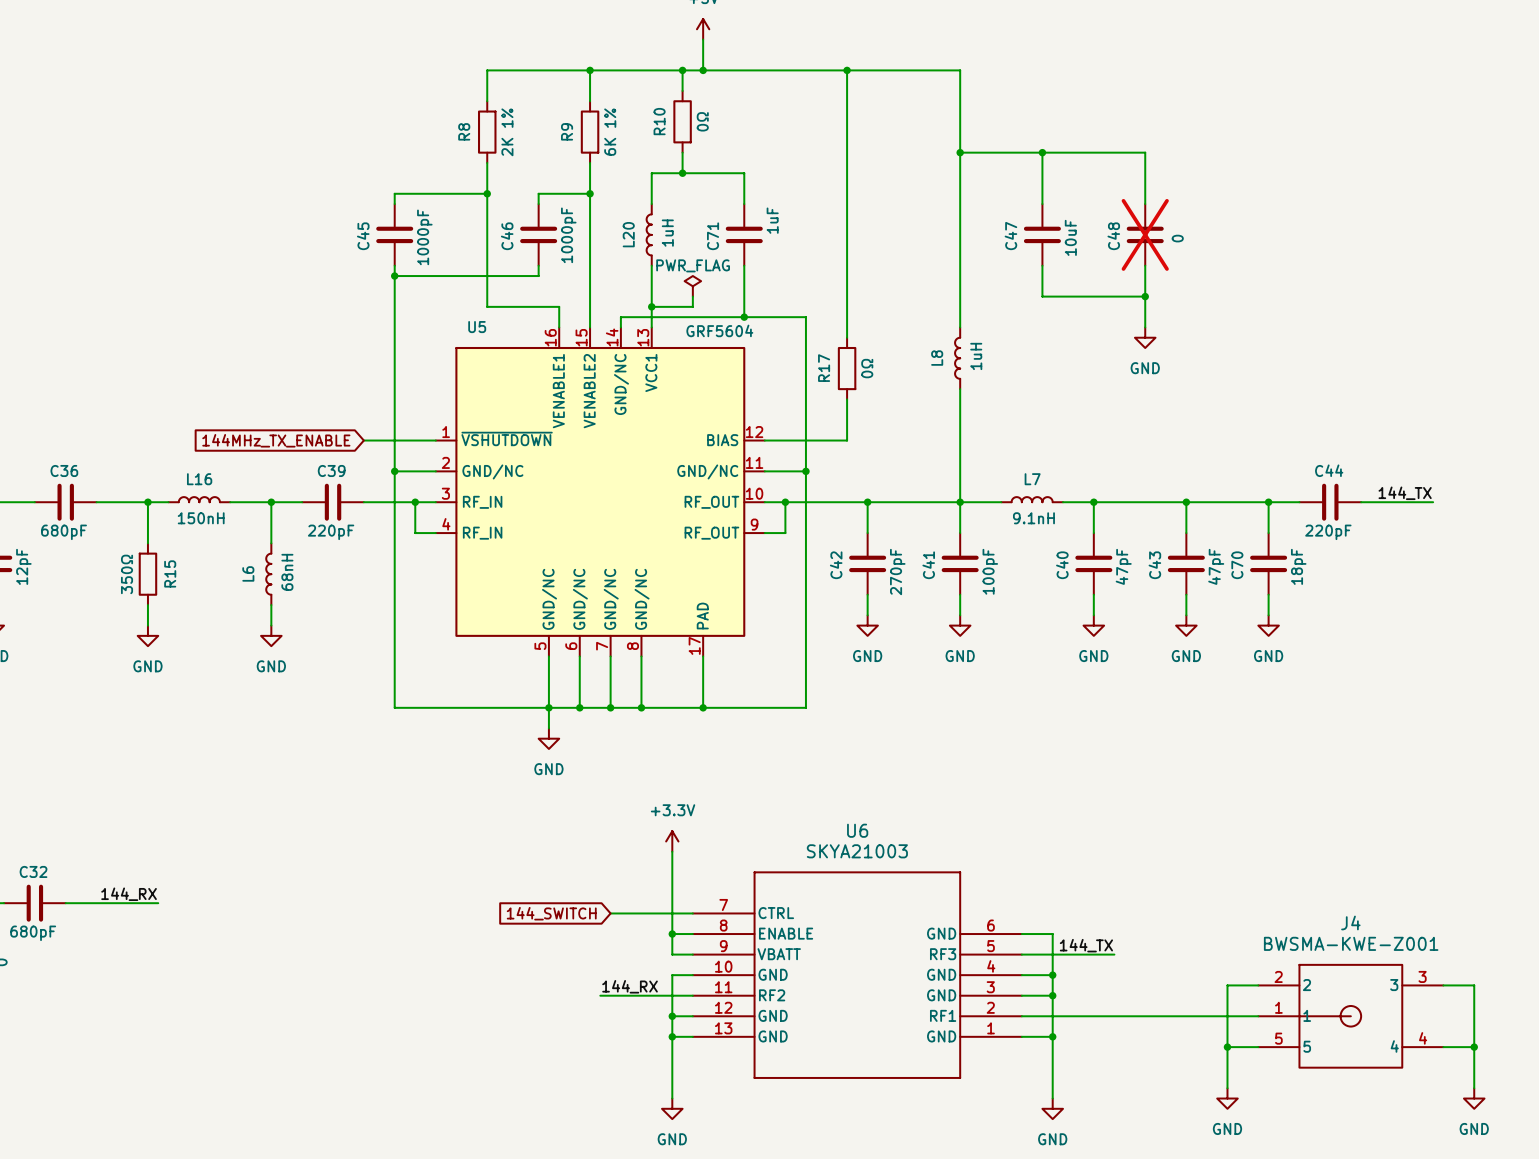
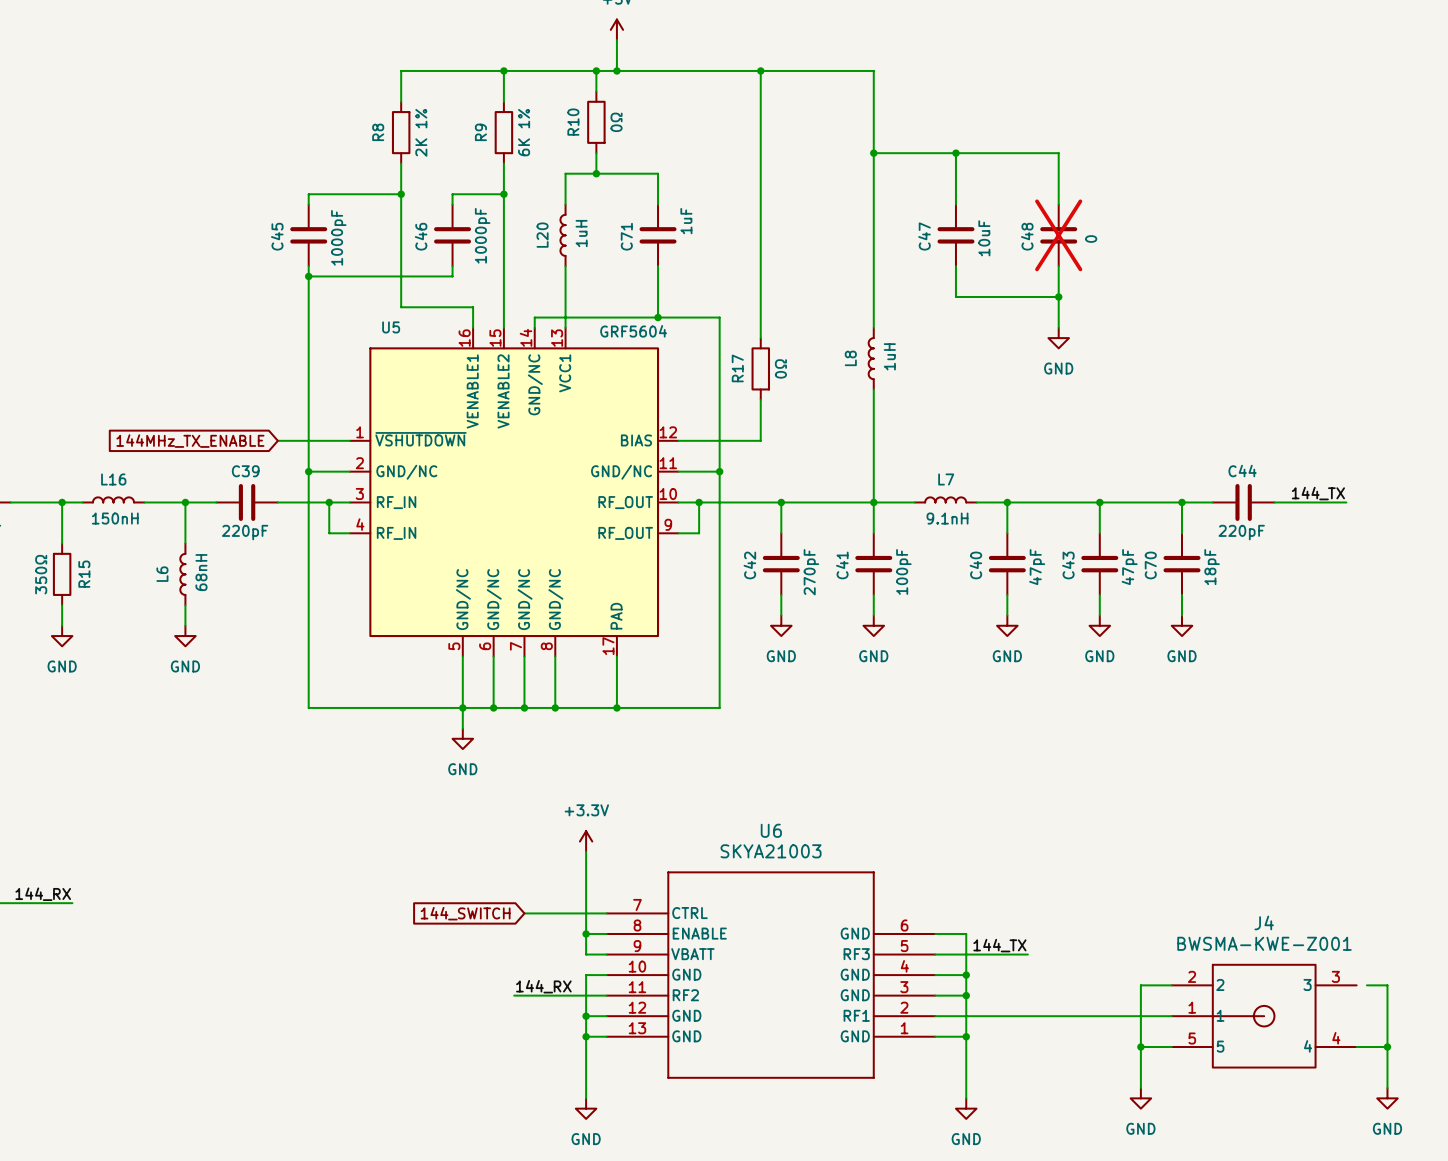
power symbol: PWR_FLAG (692, 286) -> none
wire: (692, 296) (692, 306) (651, 306) -> none
junction: (651, 306) -> none
wire: (1443, 985) (1453, 985) -> none

